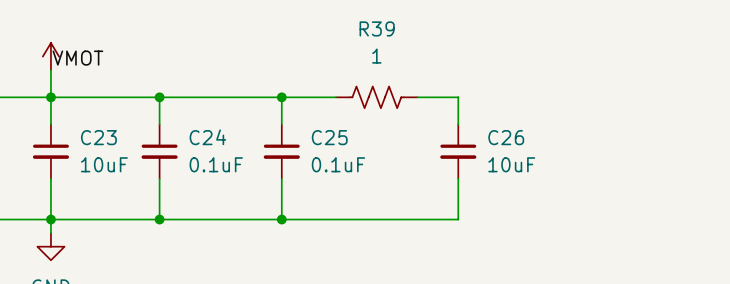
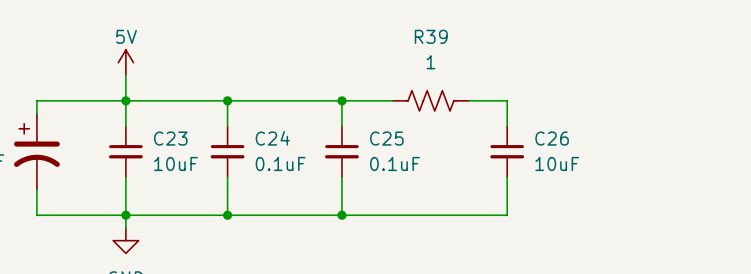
power symbol text: none -> 5V (126, 36)
label: VMOT (77, 58) -> none

